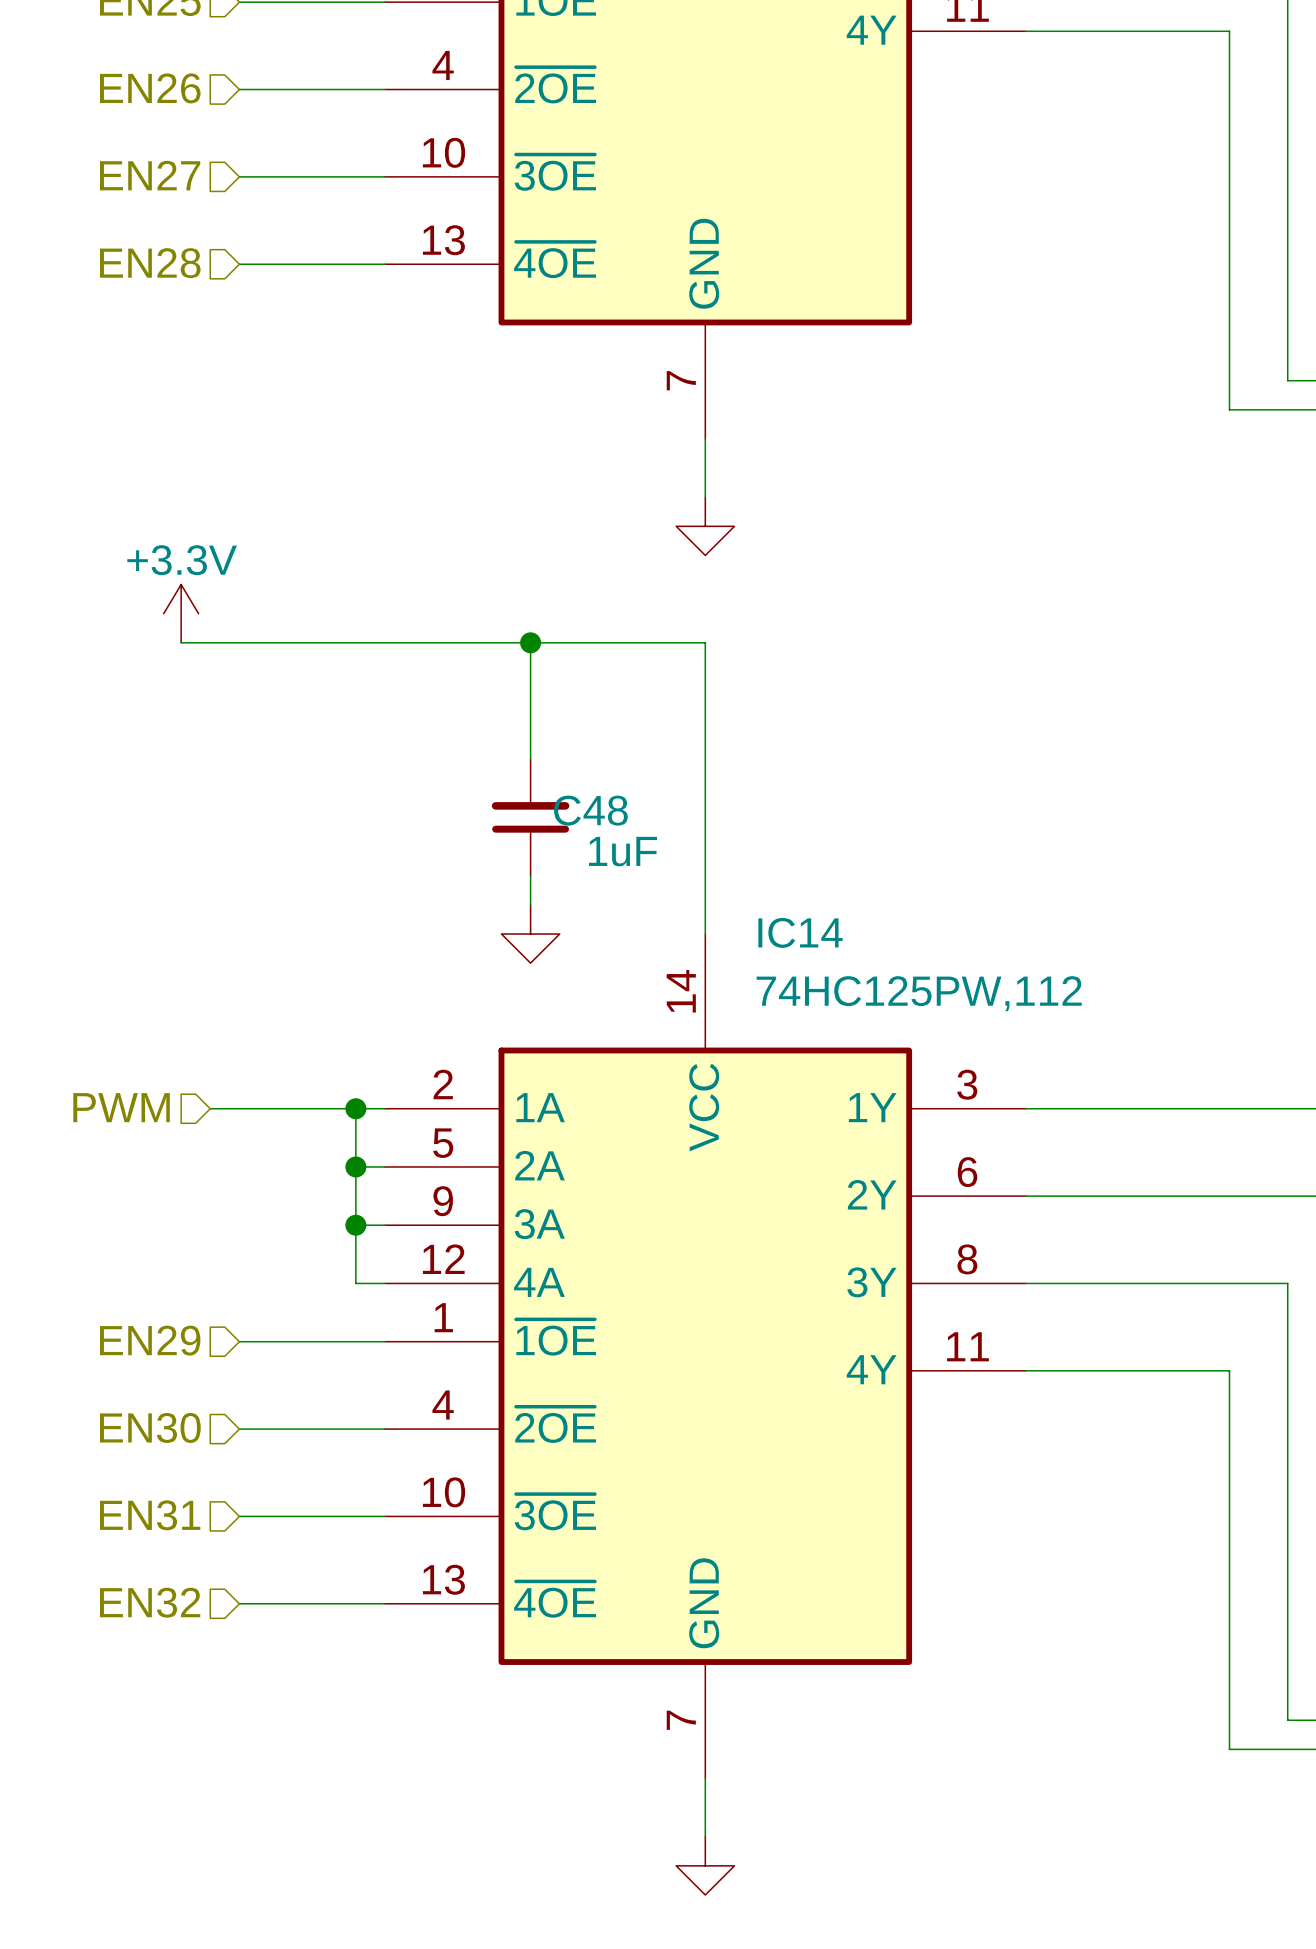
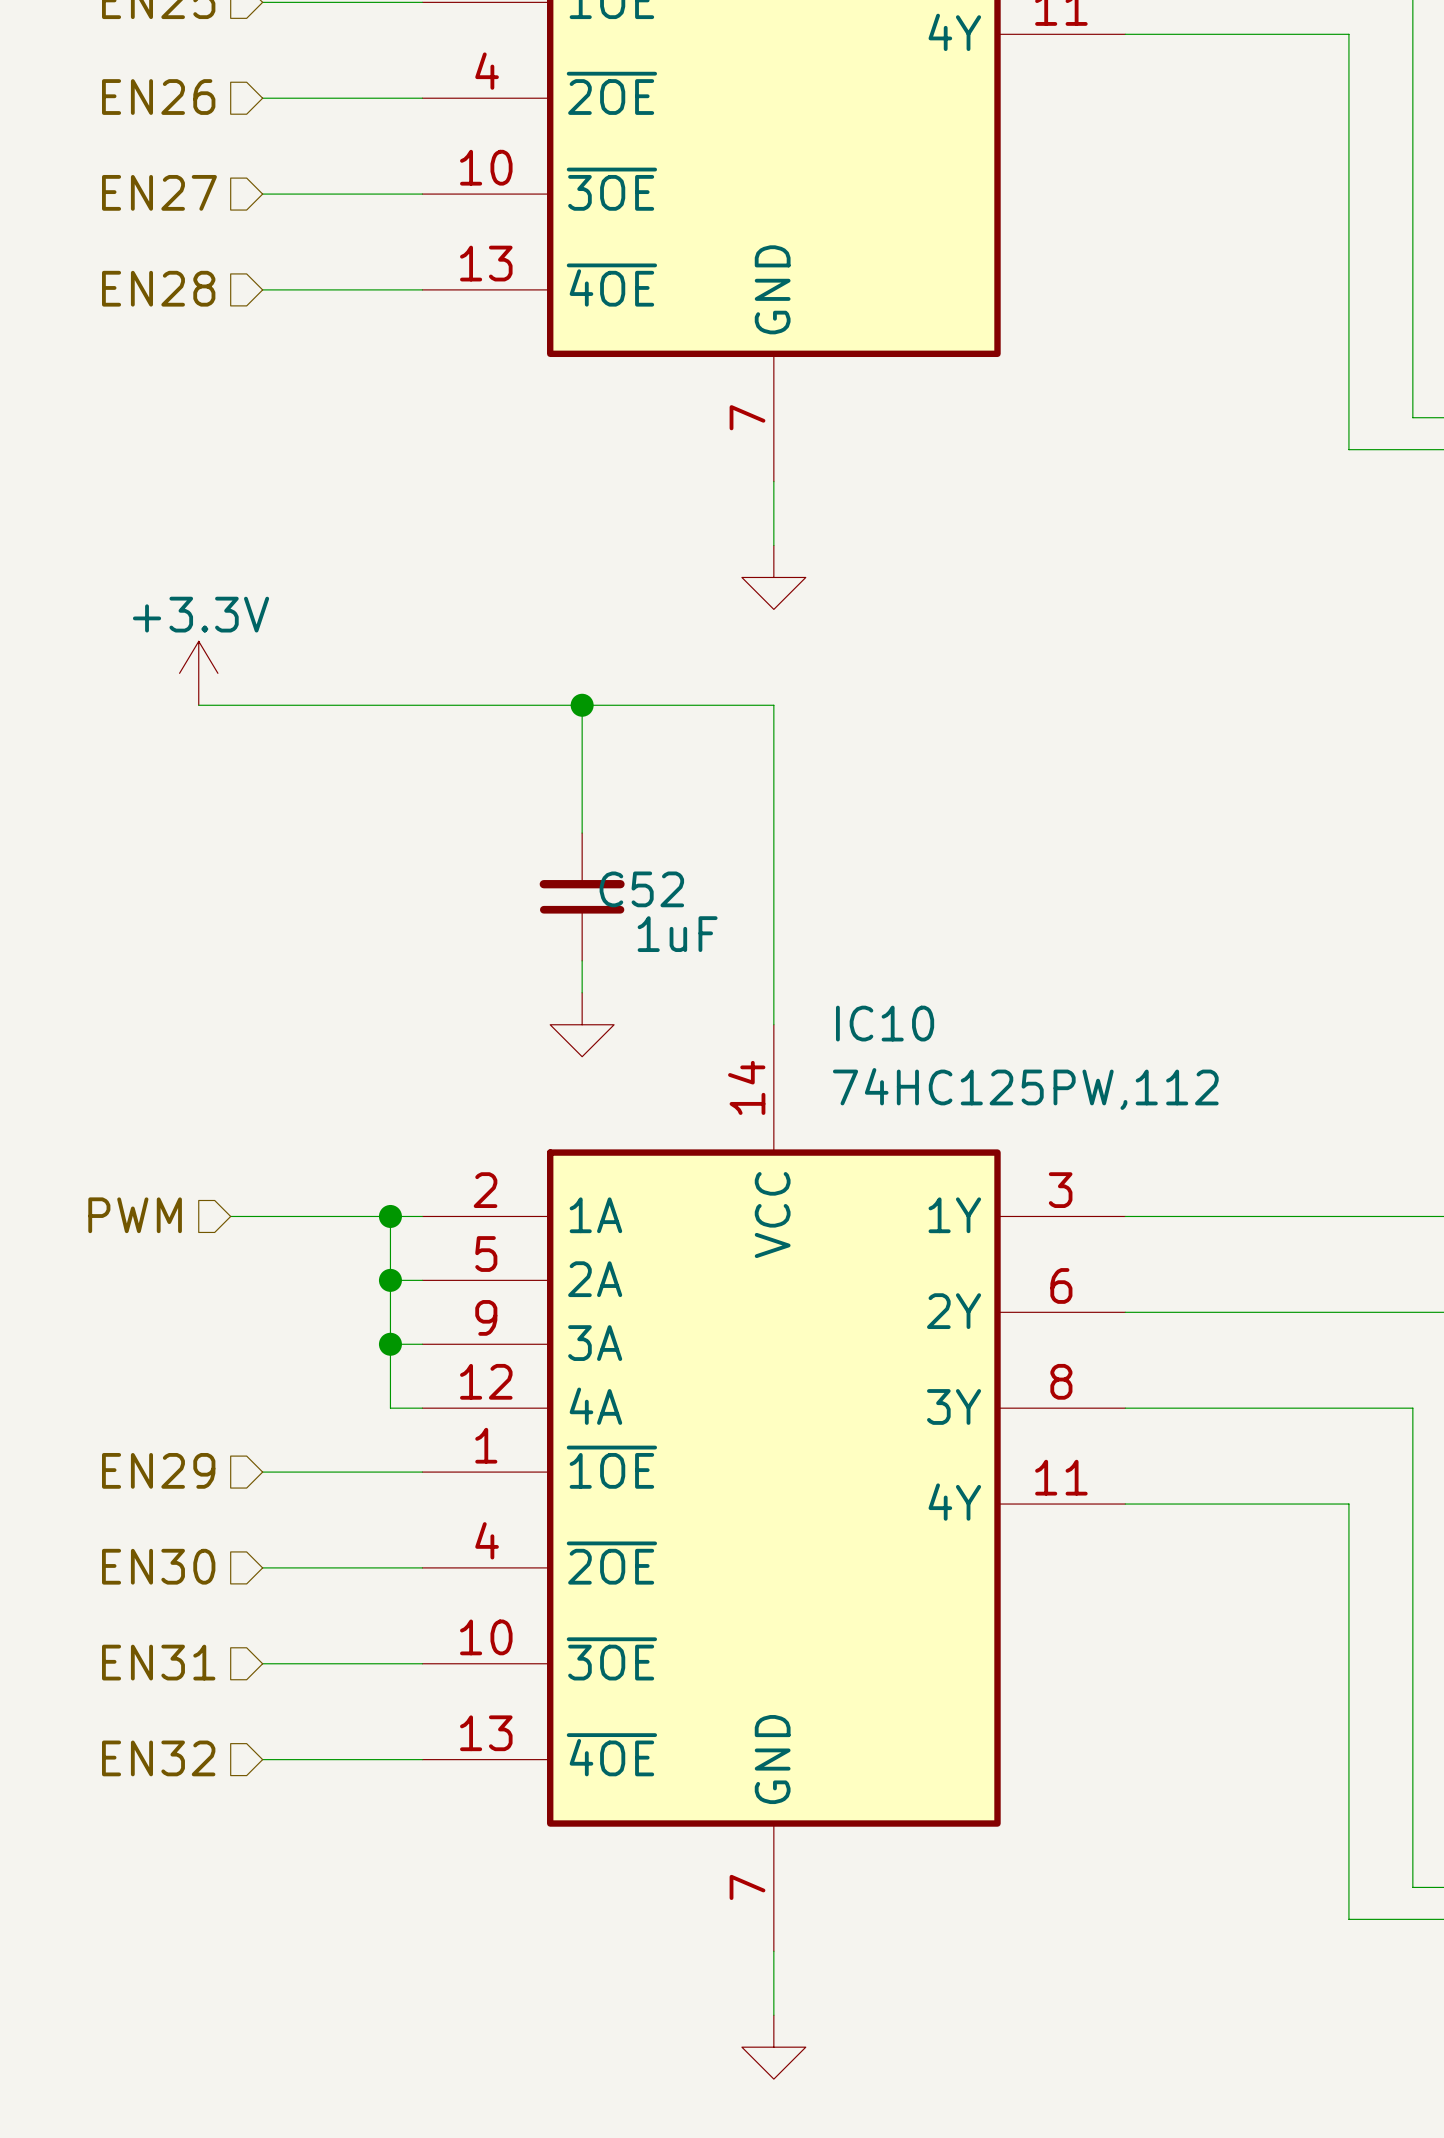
C48 name: C48 (590, 810) -> C52 (641, 889)
IC14 name: IC14 (800, 932) -> IC10 (885, 1023)

